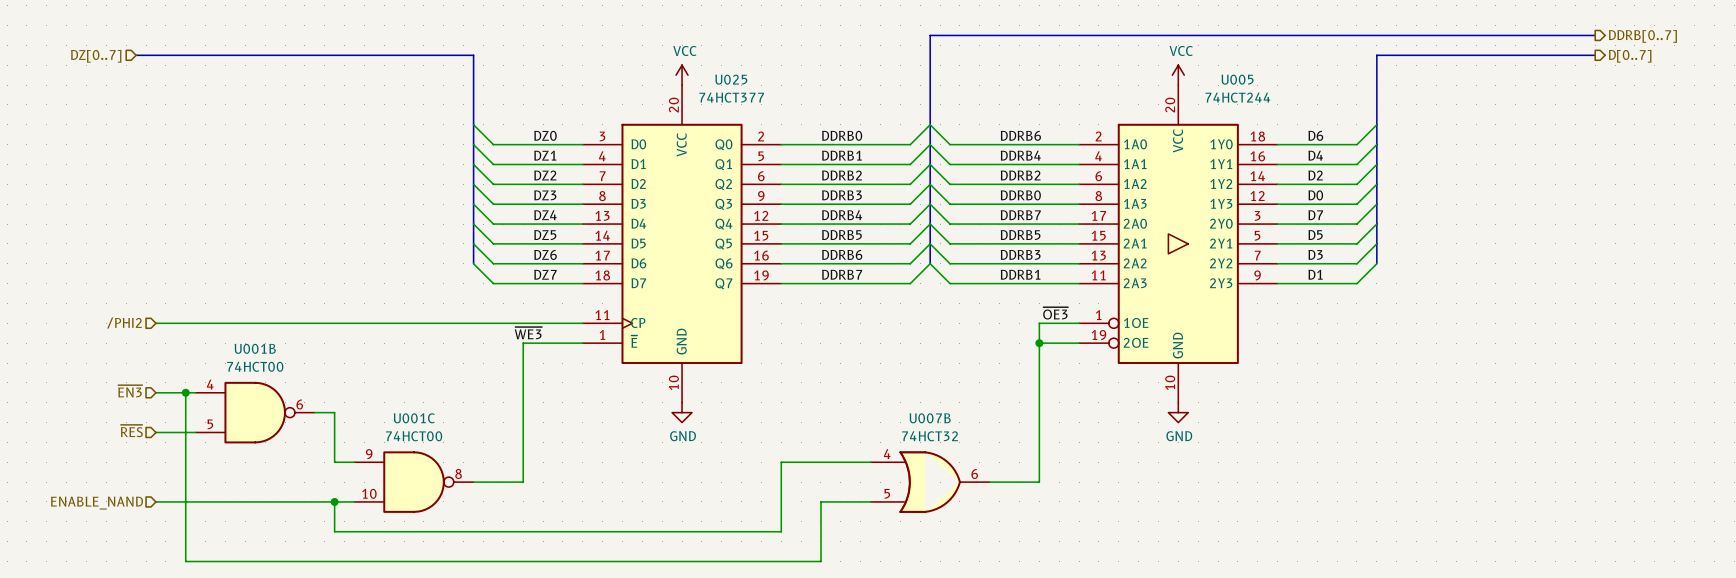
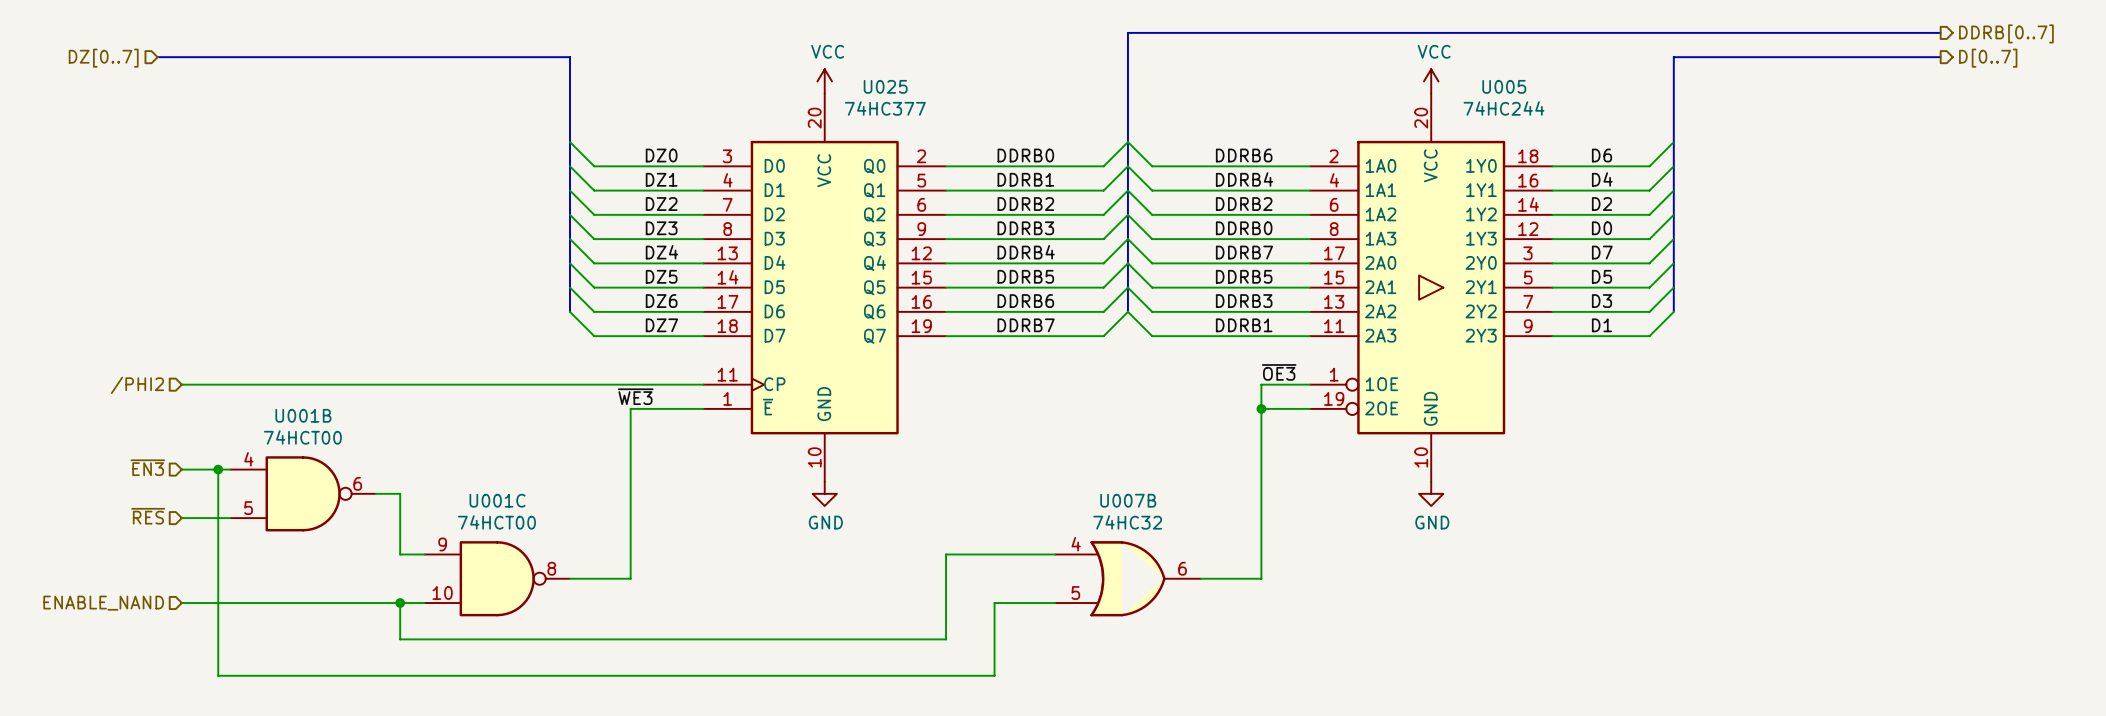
U025 value: 74HCT377 (731, 97) -> 74HC377 (885, 108)
U005 value: 74HCT244 (1237, 97) -> 74HC244 (1503, 108)
U007B value: 74HCT32 (930, 436) -> 74HC32 (1127, 522)

